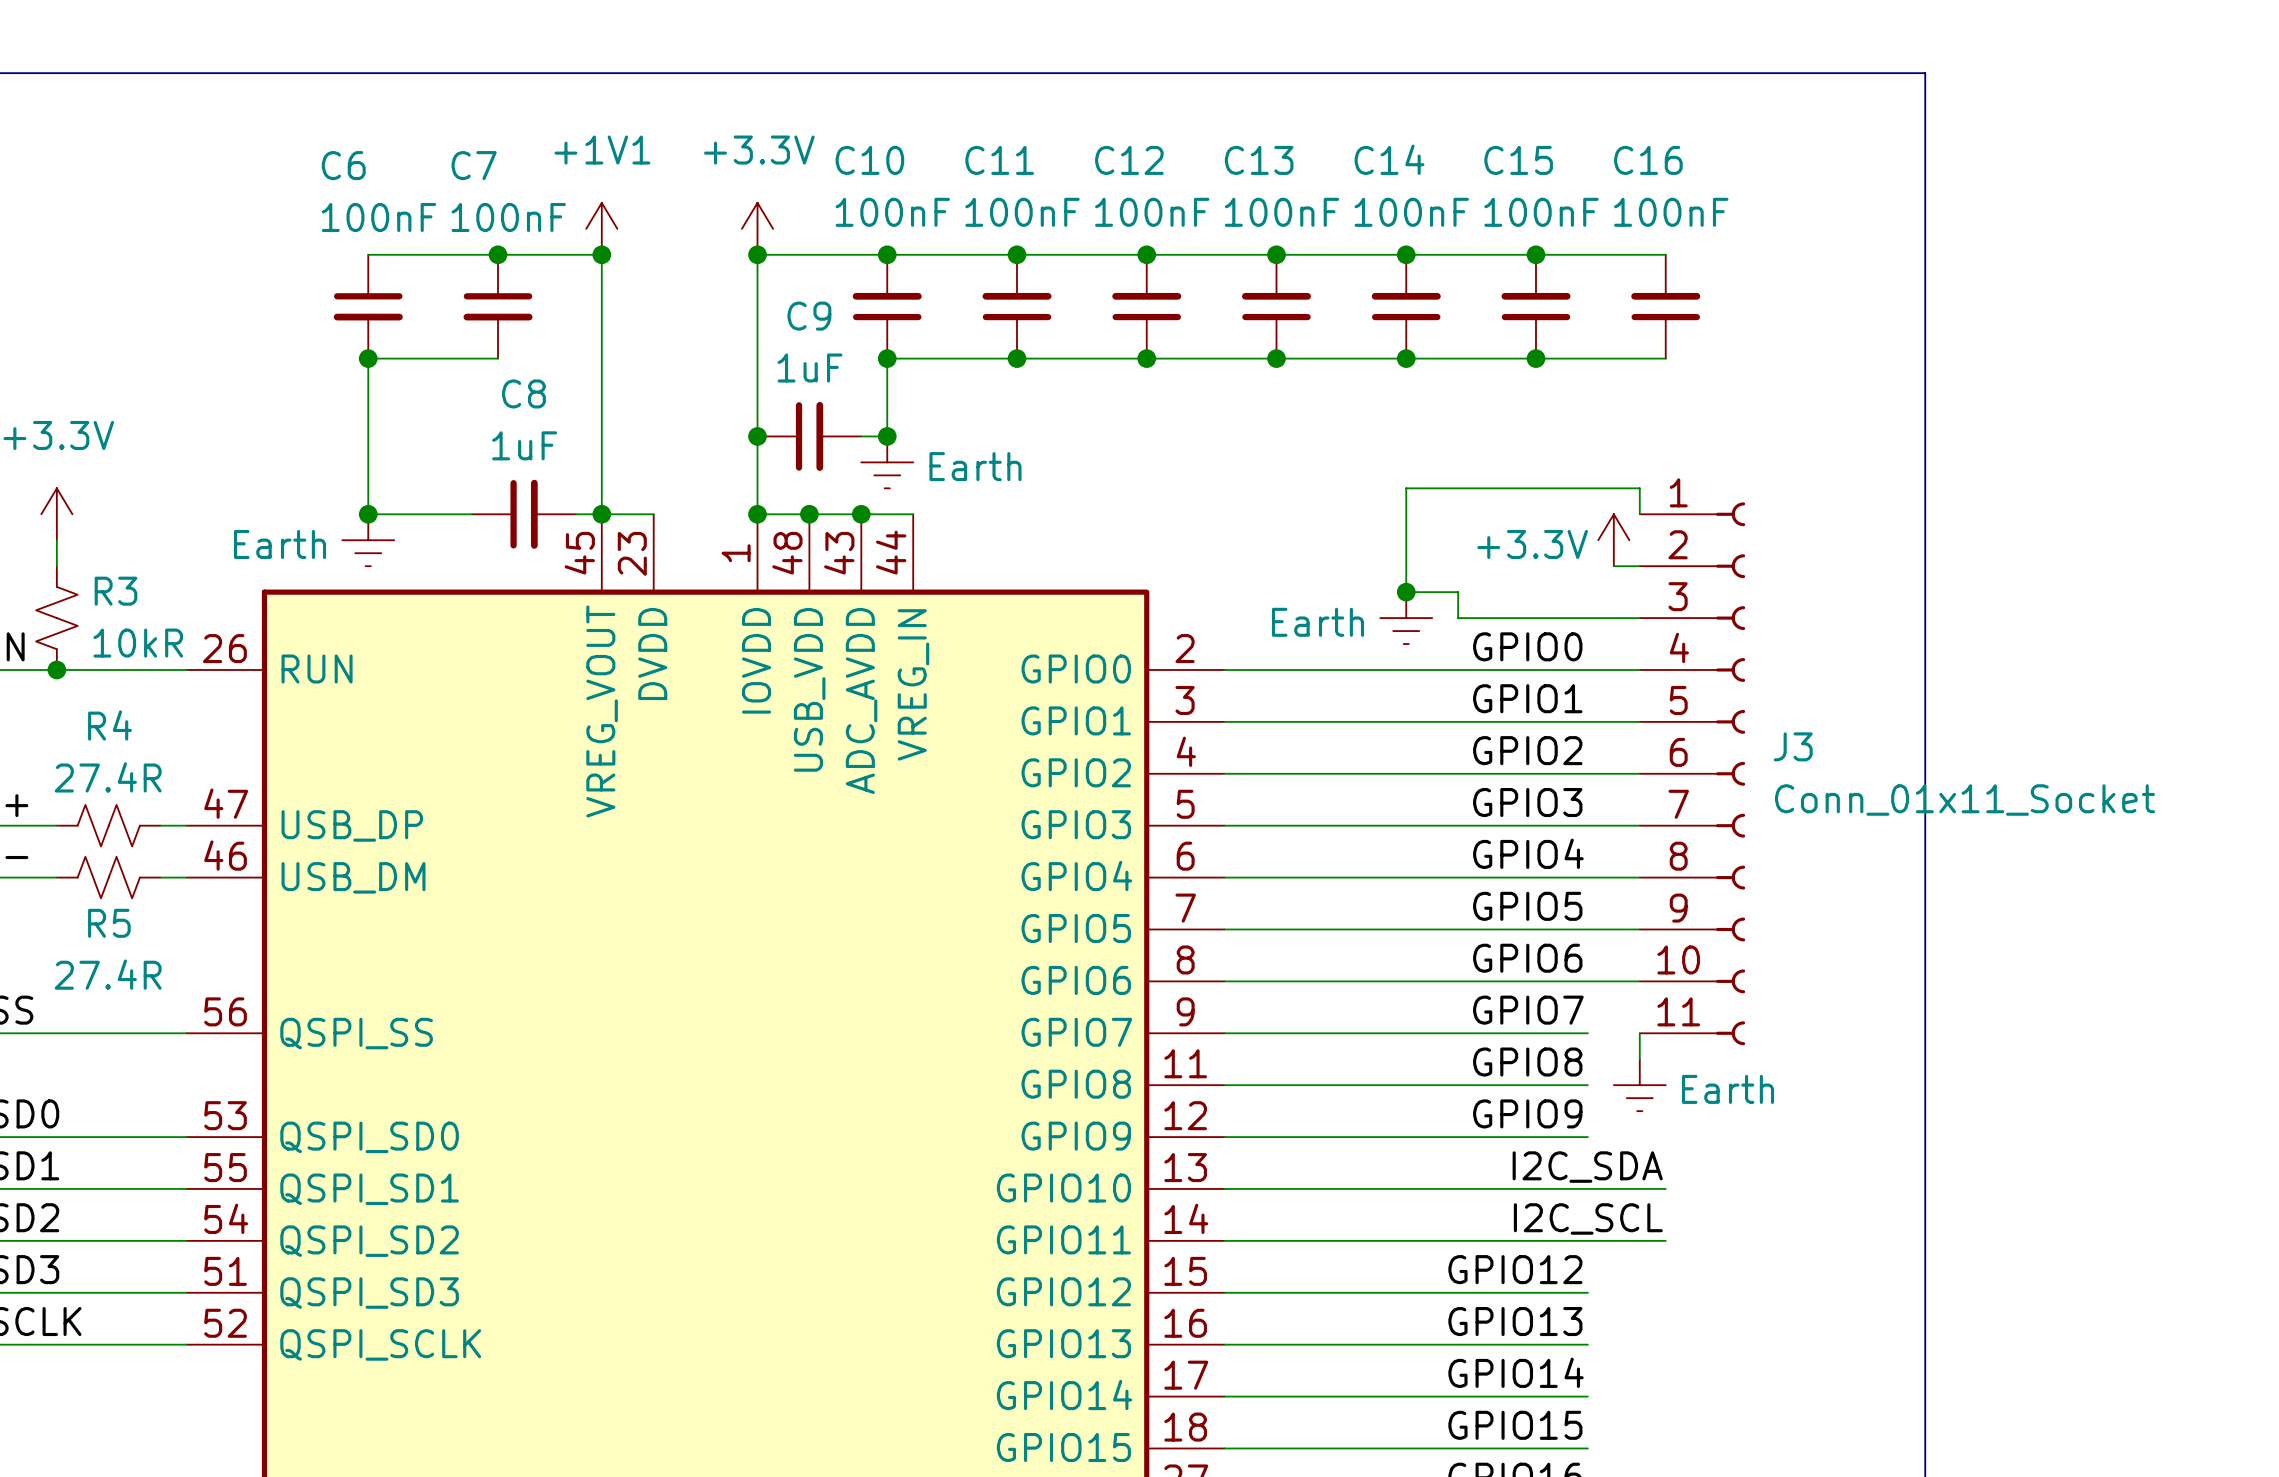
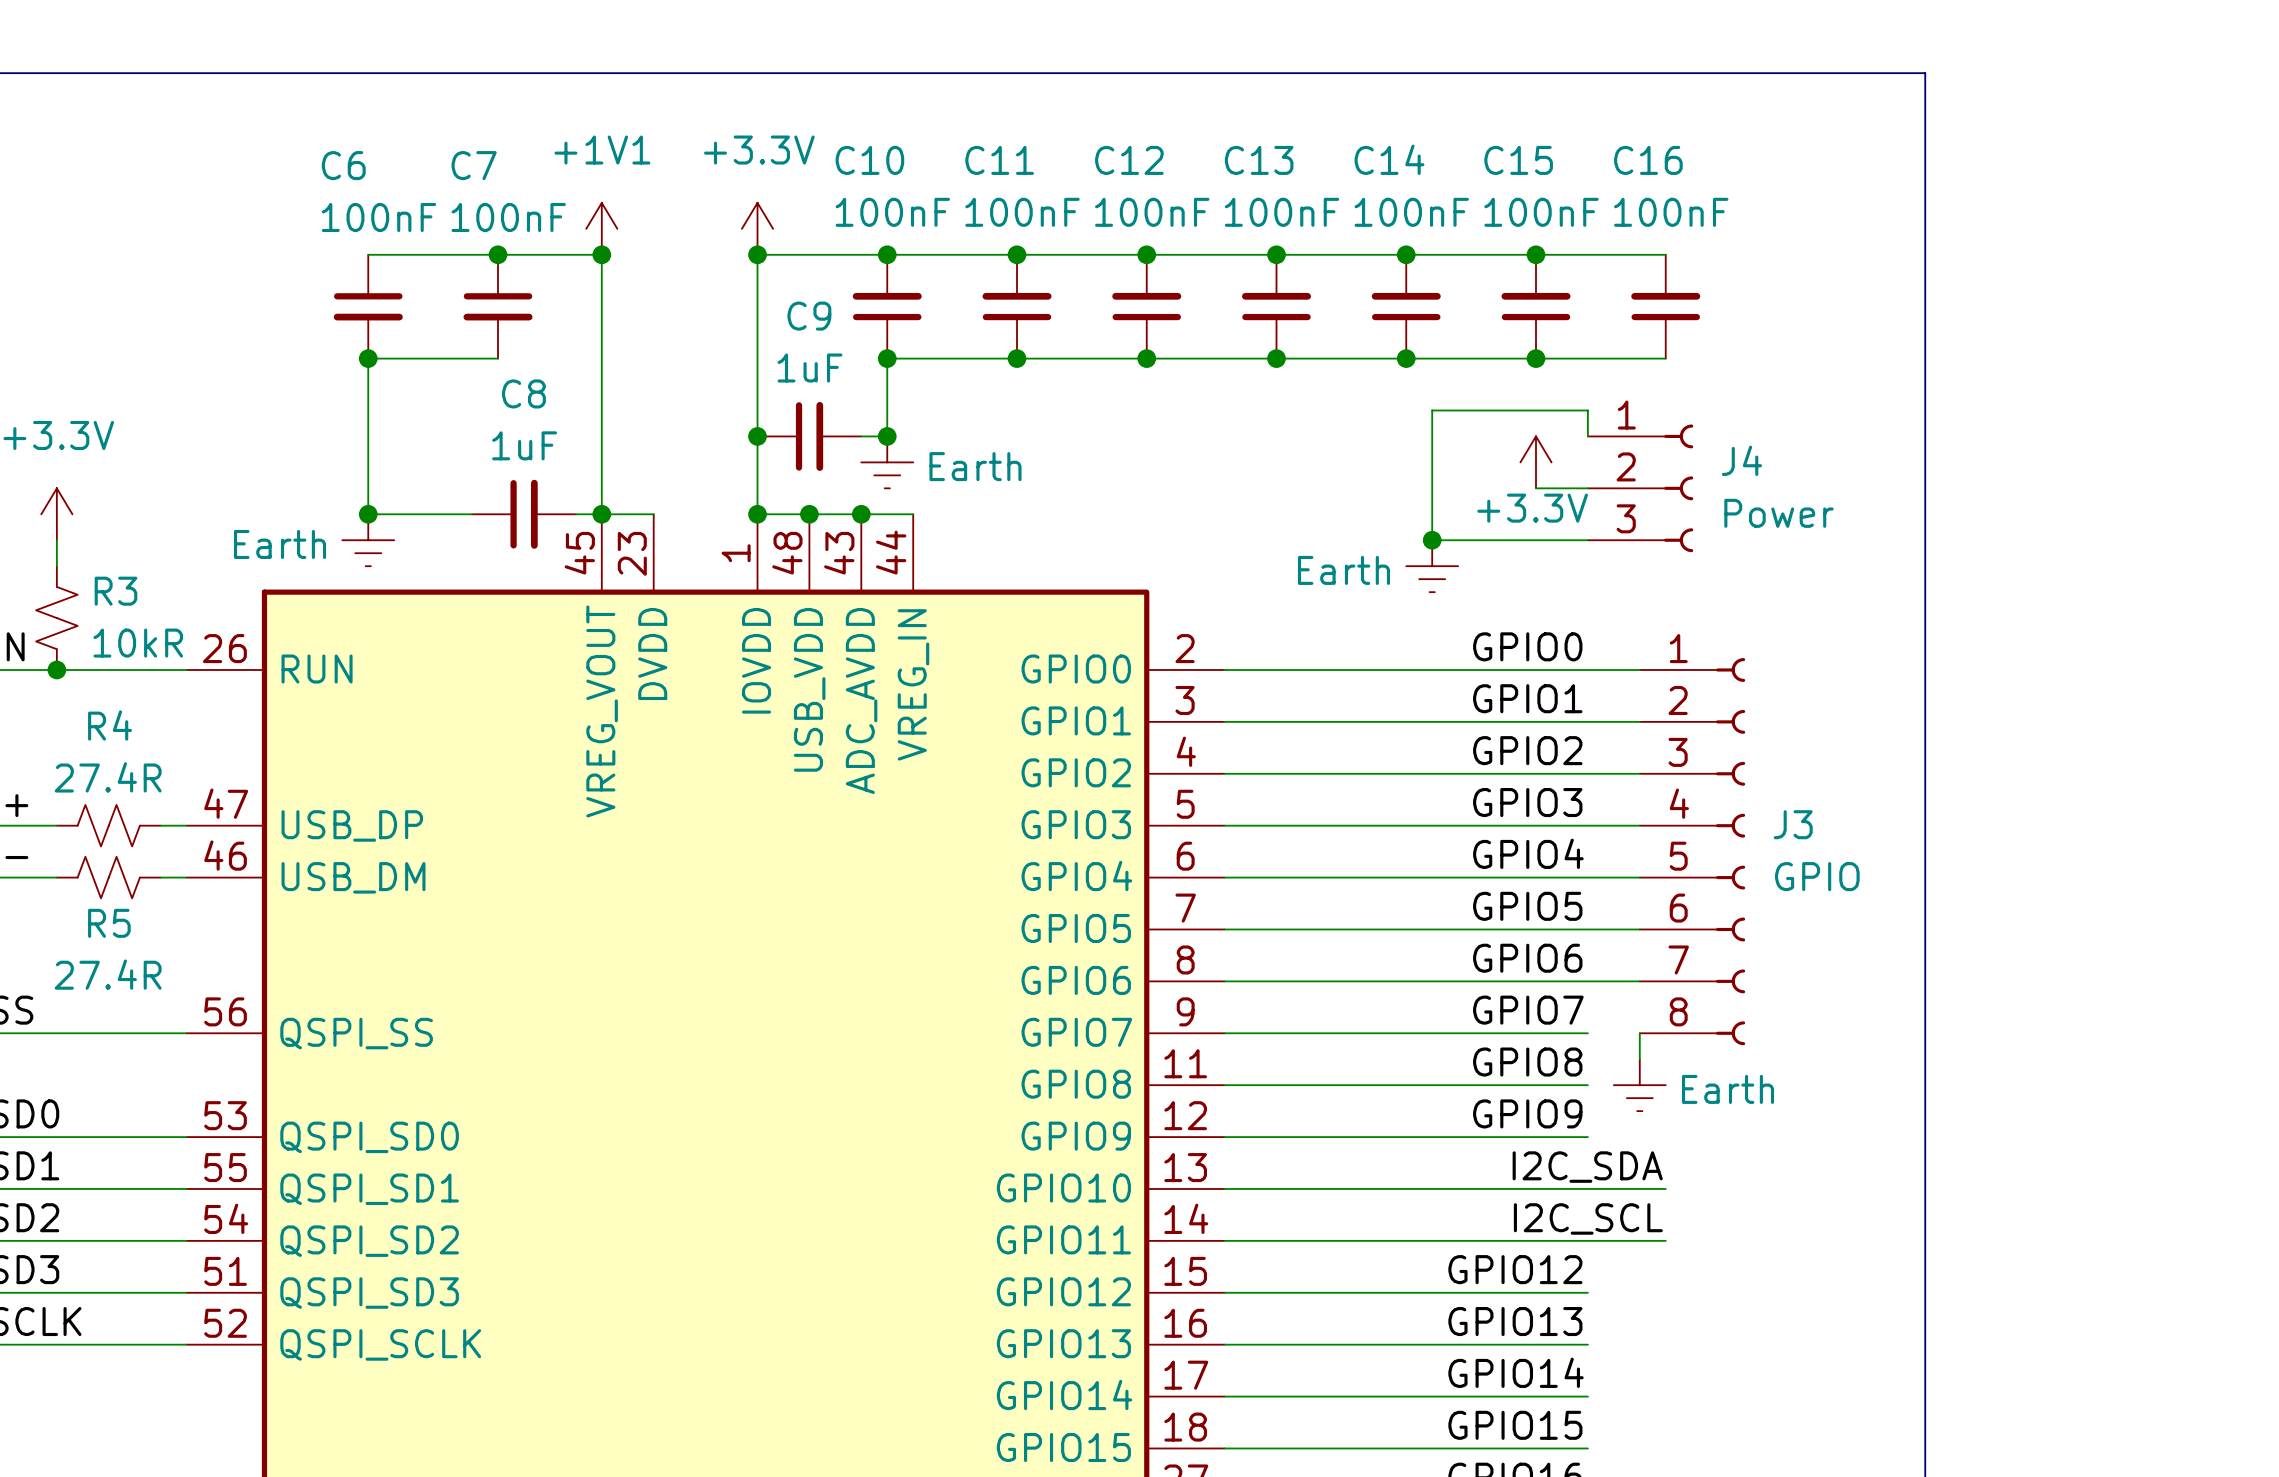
wire: none -> (1587, 436) (1587, 410) (1432, 410) (1432, 540) (1587, 540)
wire: (1535, 488) (1406, 488) (1406, 592) (1458, 592) (1458, 618) (1639, 618) -> none
wire: (1587, 488) (1639, 488) (1639, 514) -> none
J4: none -> Power (1640, 488)
J3 symbol: [1639, 502, 1746, 1046] -> [1639, 658, 1746, 1046]
power symbol position: +3.3V (1613, 540) -> +3.3V (1535, 462)
power symbol text position: +3.3V (1532, 544) -> +3.3V (1532, 508)
wire: (1613, 566) (1639, 566) -> none
junction position: (1406, 592) -> (1432, 540)
power symbol position: Earth (1406, 618) -> Earth (1432, 566)
J3 value: Conn_01x11_Socket (1964, 800) -> GPIO (1817, 876)

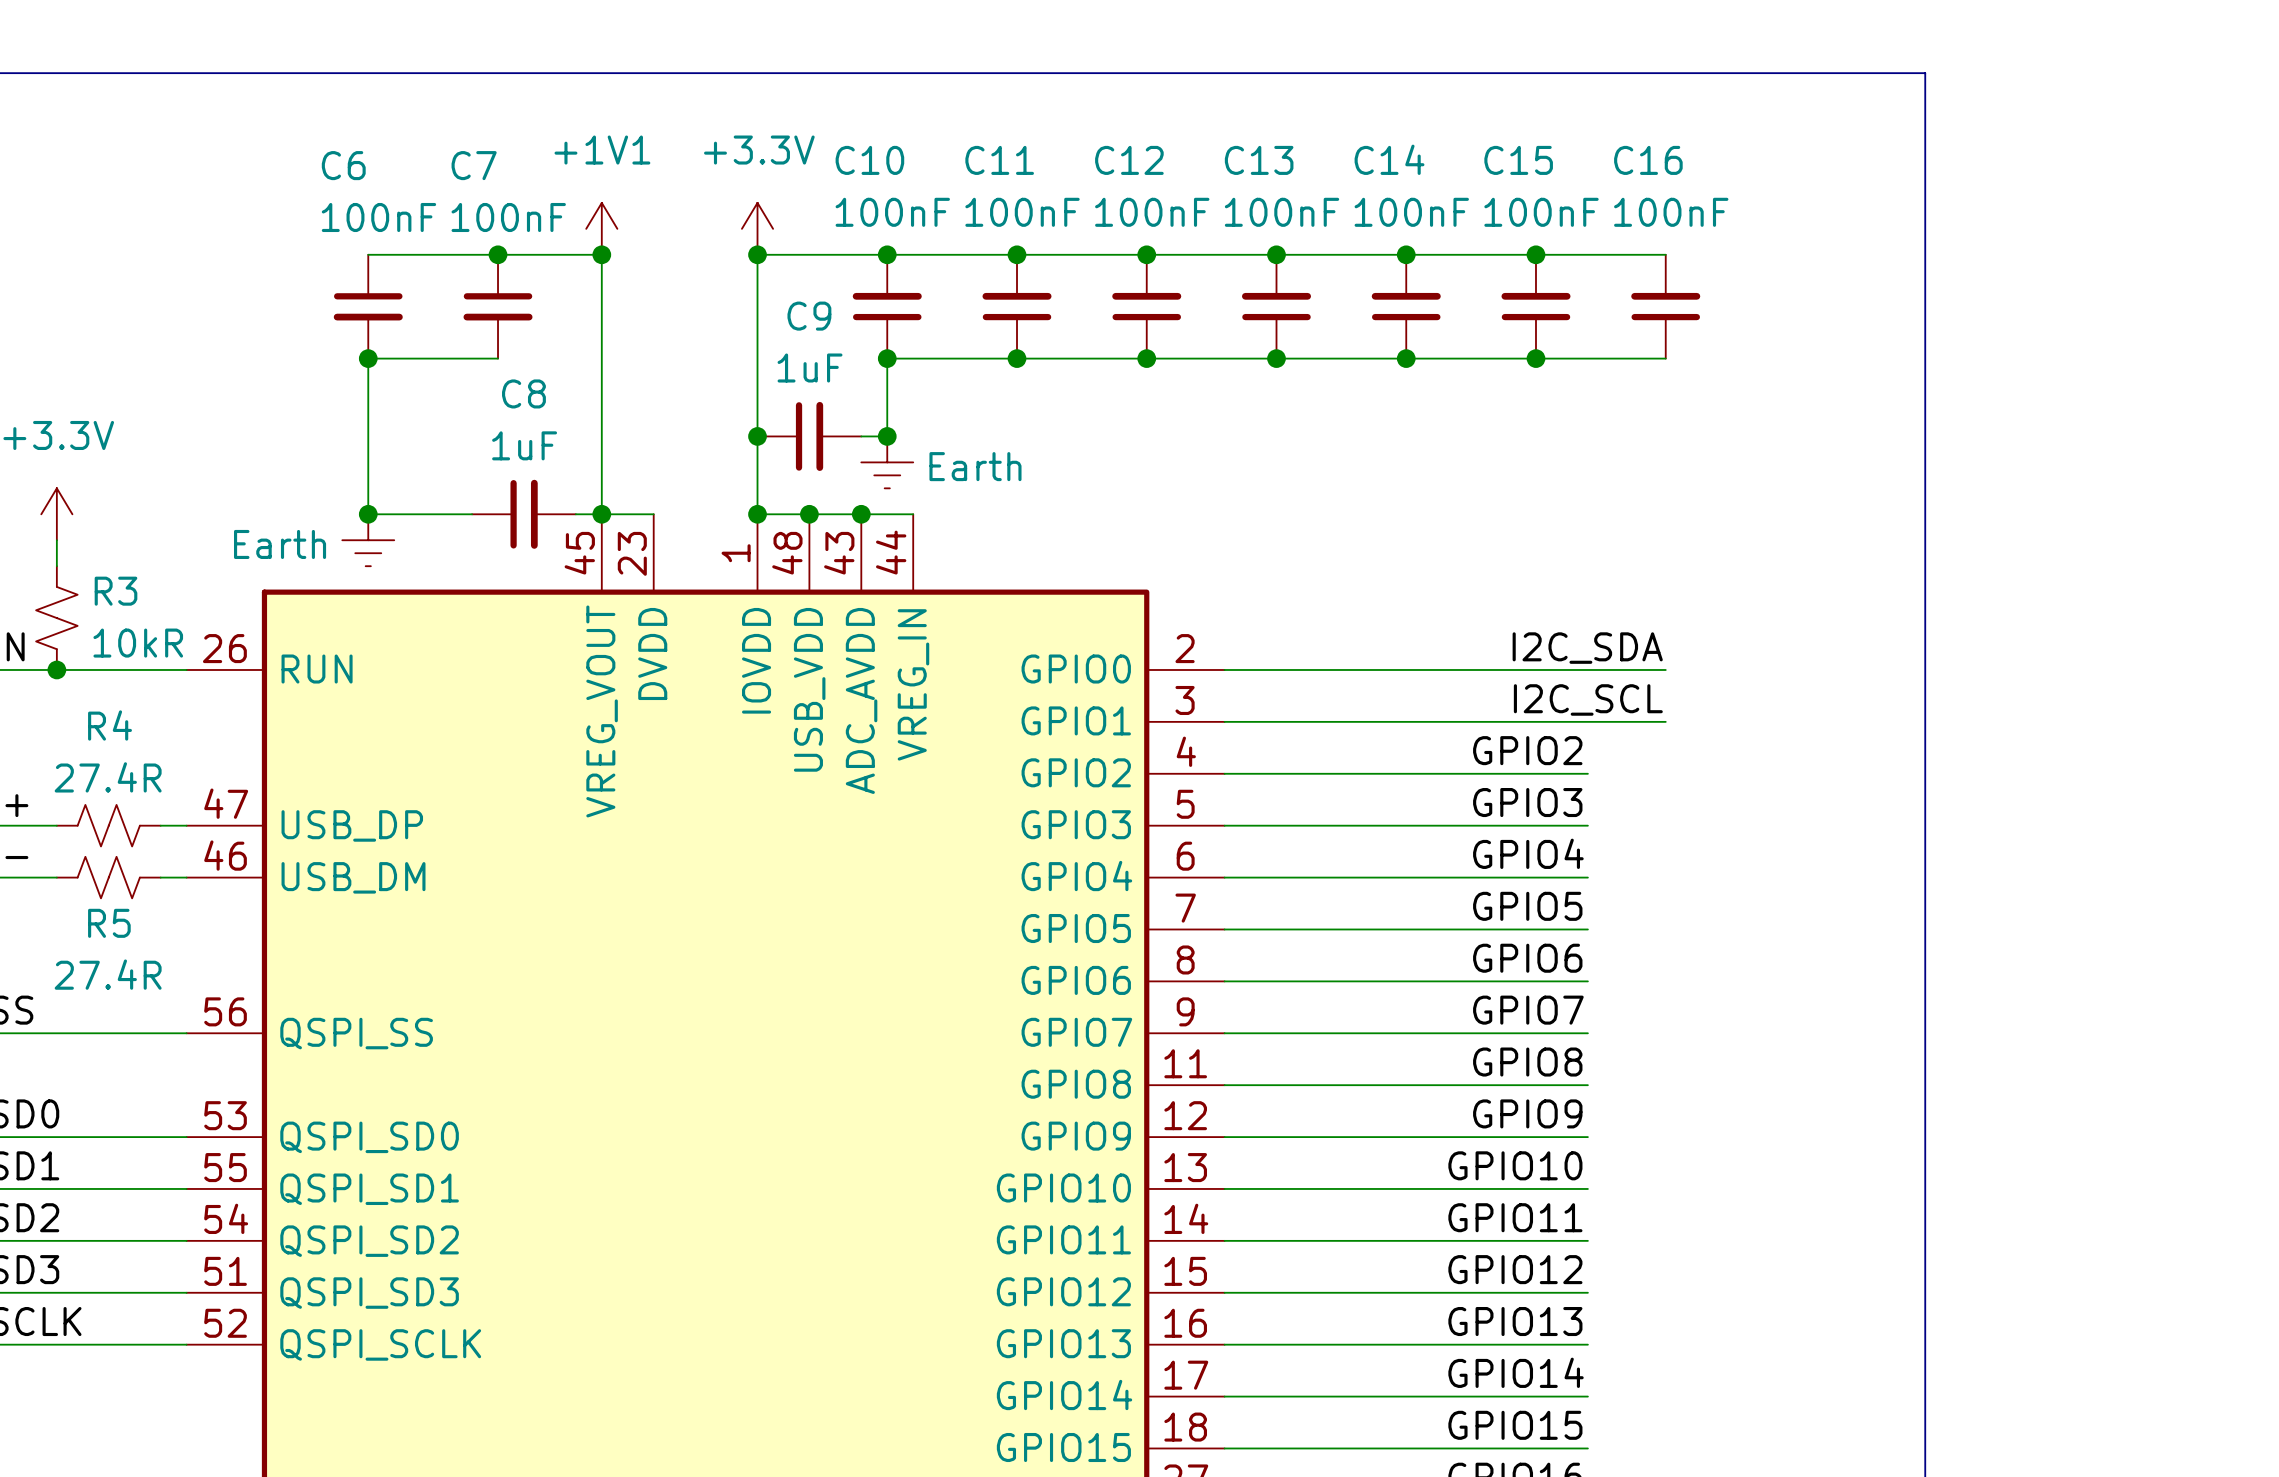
wire: (1587, 436) (1587, 410) (1432, 410) (1432, 540) (1587, 540) -> none
power symbol: +3.3V (1535, 462) -> none
wire: (1535, 488) (1587, 488) -> none
J4: Power (1640, 488) -> none
junction: (1432, 540) -> none
power symbol: Earth (1432, 566) -> none
label: GPIO0 (1527, 646) -> none
label: none -> I2C_SDA (1587, 648)
label: GPIO1 (1527, 698) -> none
label: none -> I2C_SCL (1588, 699)
wire: (1587, 773) (1639, 773) -> none
wire: (1587, 825) (1639, 825) -> none
J3: GPIO (1692, 851) -> none
wire: (1587, 877) (1639, 877) -> none
wire: (1587, 929) (1639, 929) -> none
wire: (1587, 981) (1639, 981) -> none
wire: (1639, 1033) (1639, 1059) -> none
power symbol: Earth (1639, 1085) -> none
label: none -> GPIO10 (1515, 1165)
label: I2C_SDA (1587, 1167) -> none
wire: (1587, 1188) (1665, 1188) -> none
label: none -> GPIO11 (1515, 1217)
label: I2C_SCL (1588, 1218) -> none
wire: (1587, 1240) (1665, 1240) -> none

